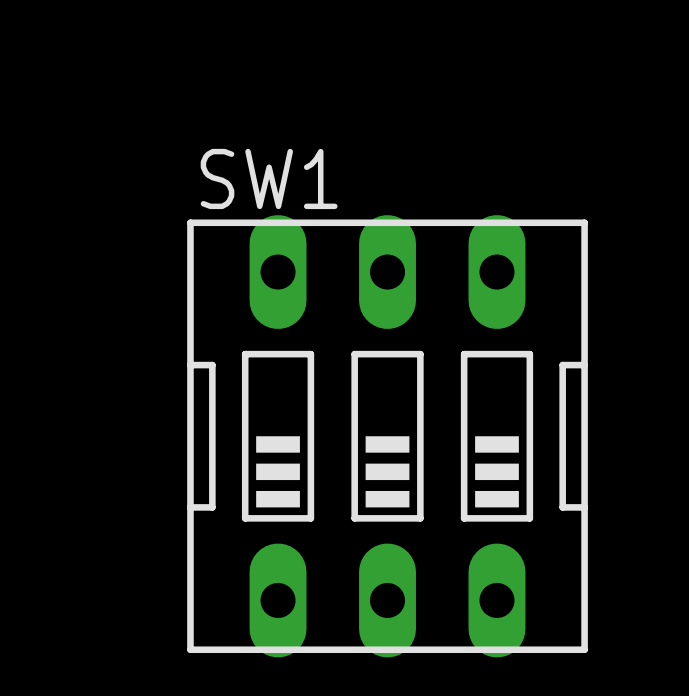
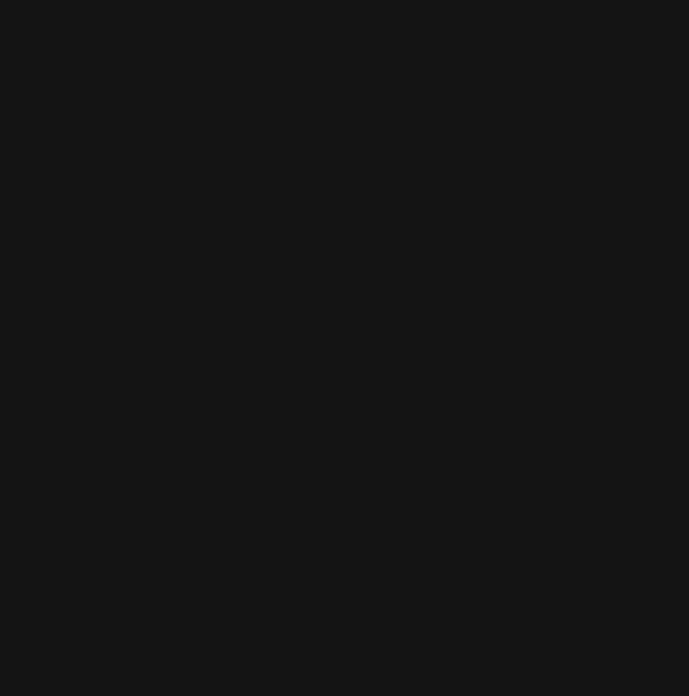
SW1: (387, 436) -> none

